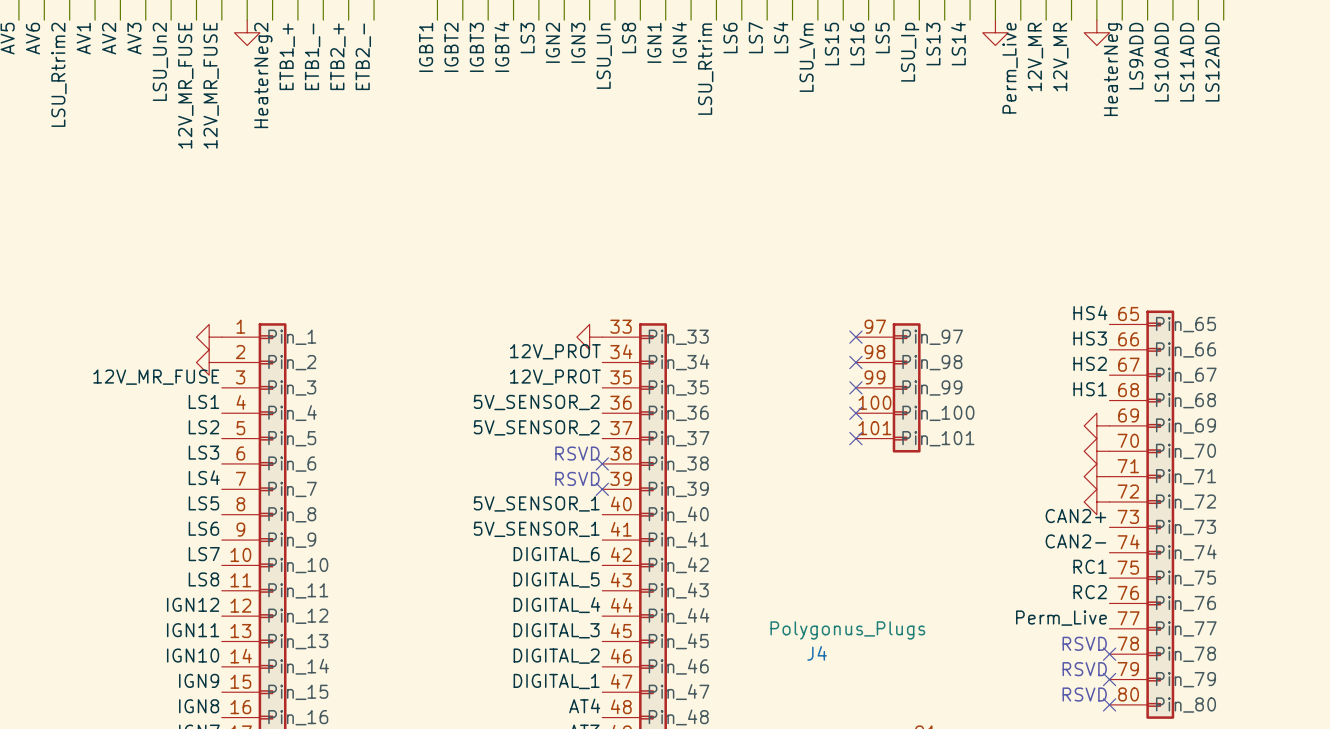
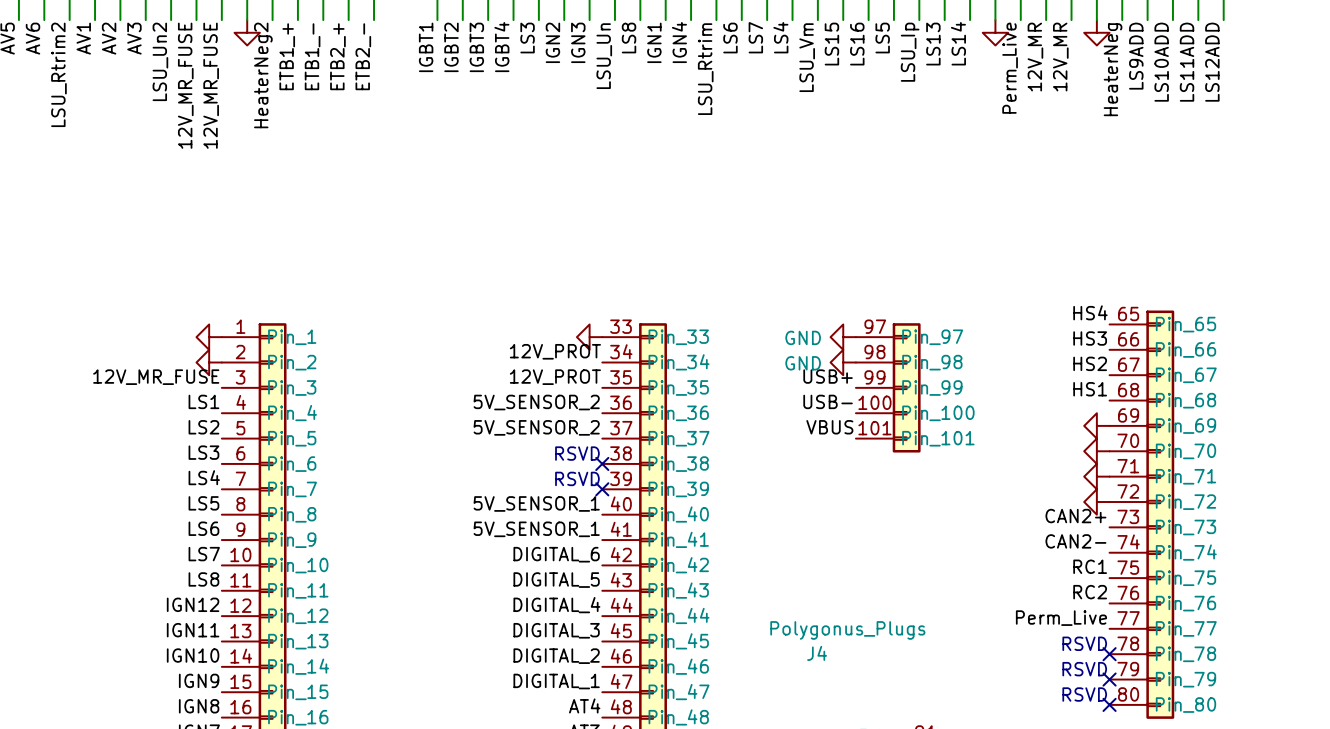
power symbol: none -> GND (843, 337)
no-connect mark: (855, 337) -> none
power symbol: none -> GND (843, 362)
no-connect mark: (855, 362) -> none
label: none -> USB+ (828, 376)
no-connect mark: (855, 387) -> none
label: none -> USB- (828, 401)
no-connect mark: (855, 413) -> none
label: none -> VBUS (829, 427)
no-connect mark: (855, 438) -> none

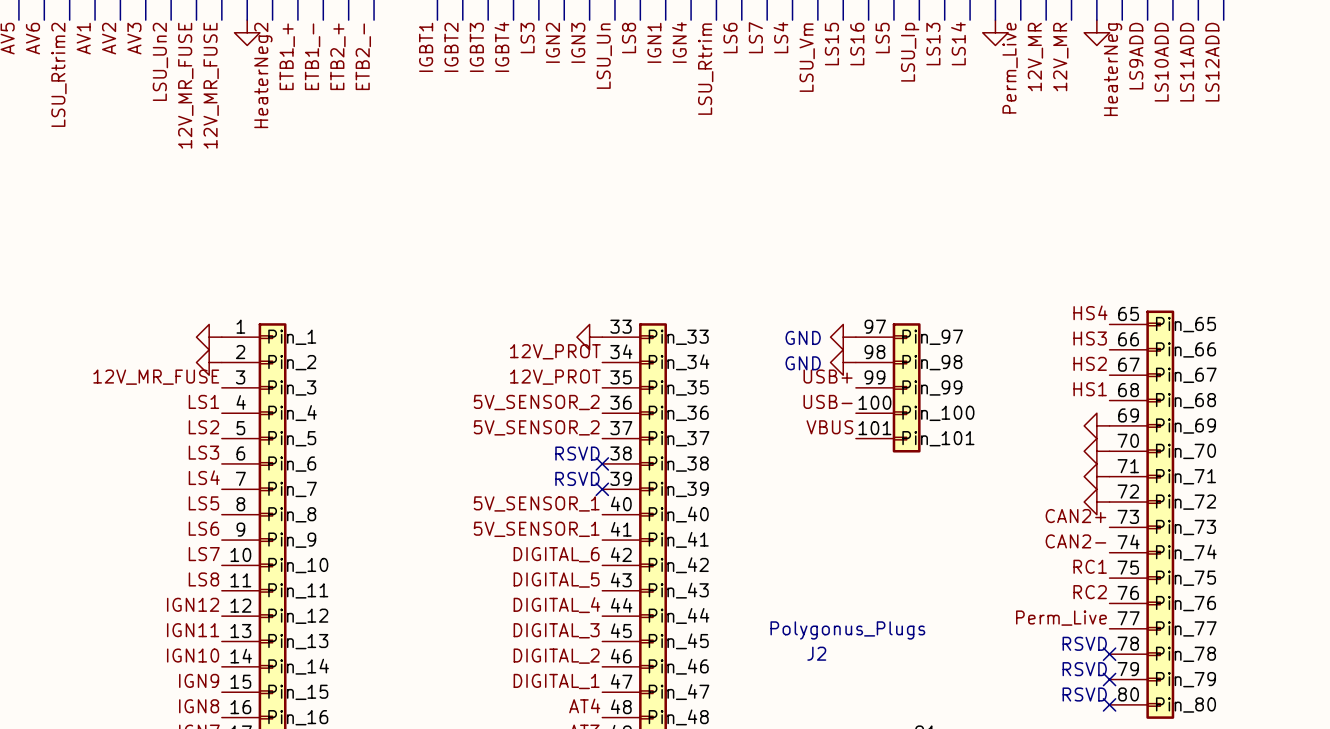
J4 name: J4 (817, 653) -> J2 (816, 653)

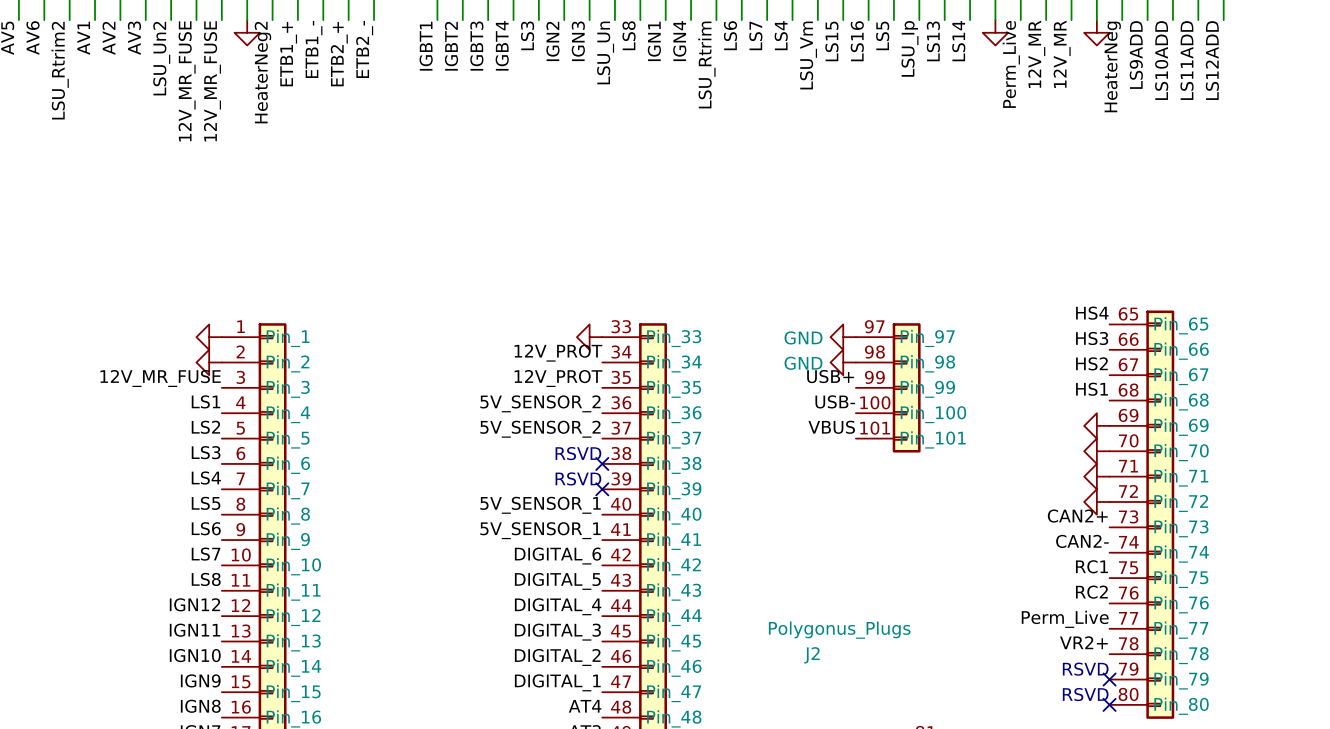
label: none -> VR2+ (1083, 642)
text: RSVD (1084, 643) -> none
no-connect mark: (1109, 654) -> none

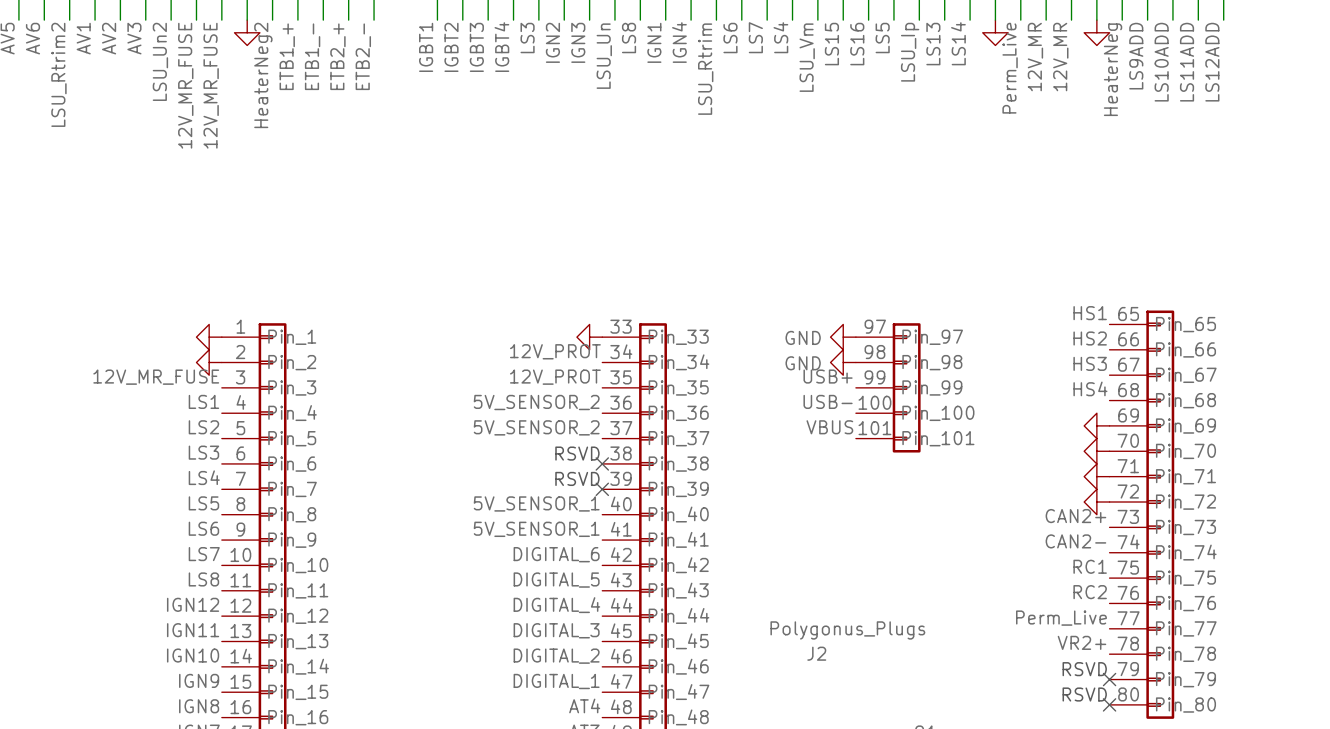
label: HS4 (1092, 313) -> HS1 (1090, 313)
label: HS3 (1092, 338) -> HS2 (1090, 338)
label: HS2 (1091, 363) -> HS3 (1090, 363)
label: HS1 (1092, 389) -> HS4 (1090, 388)

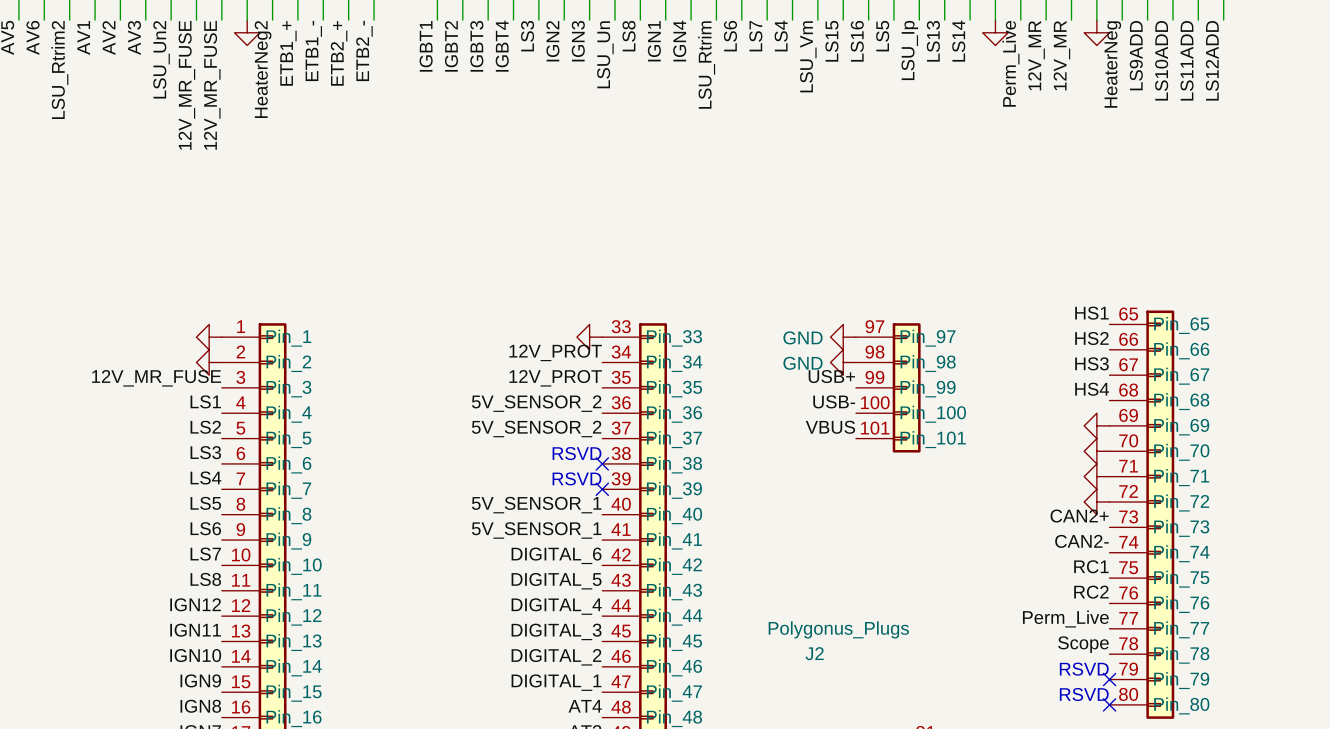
label: VR2+ (1081, 642) -> Scope (1083, 644)

